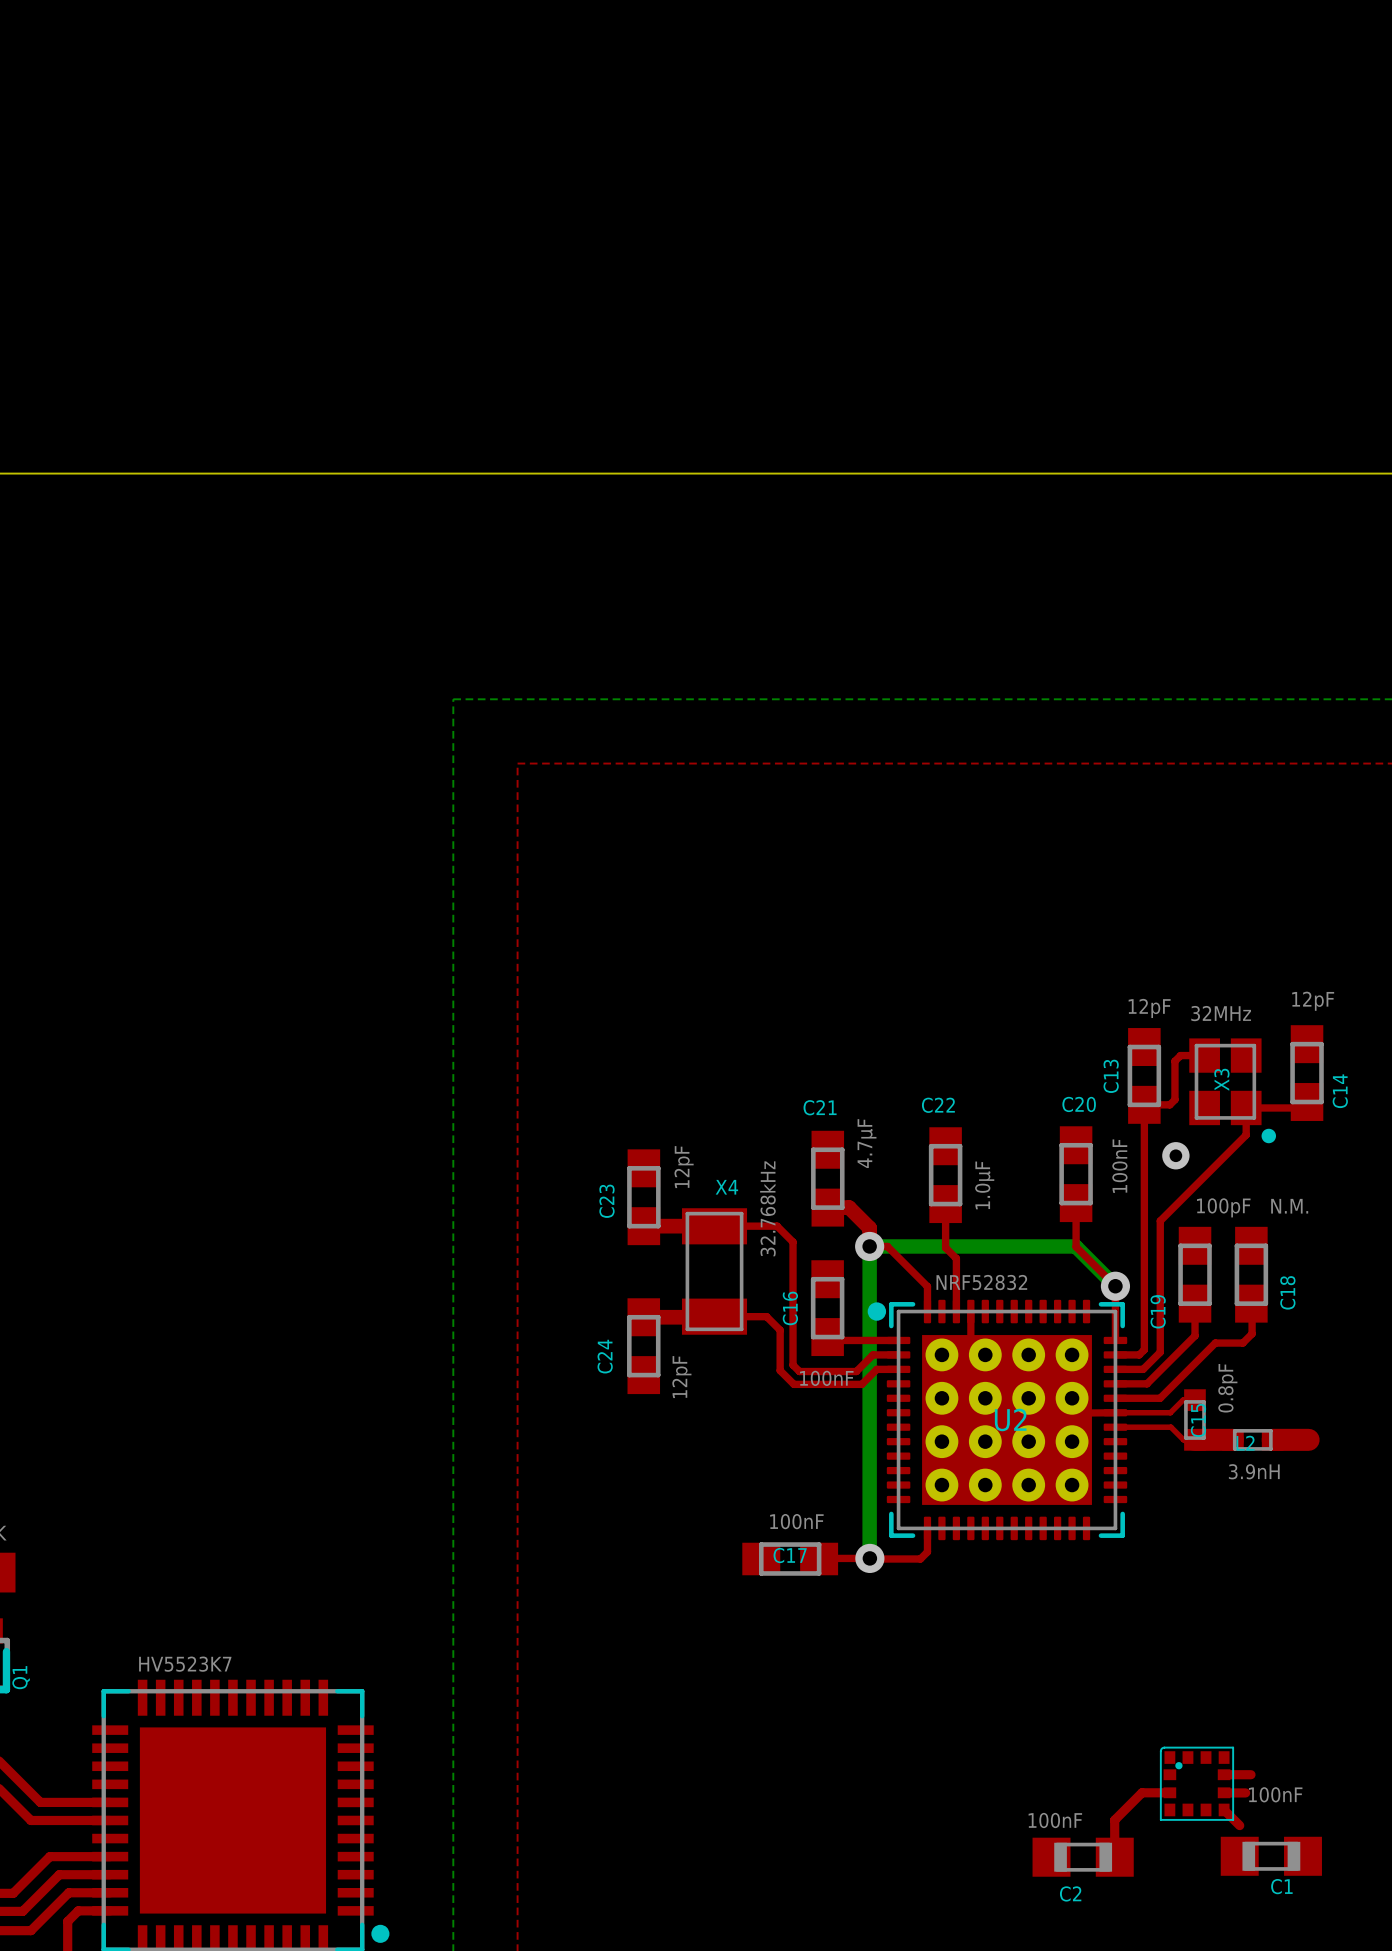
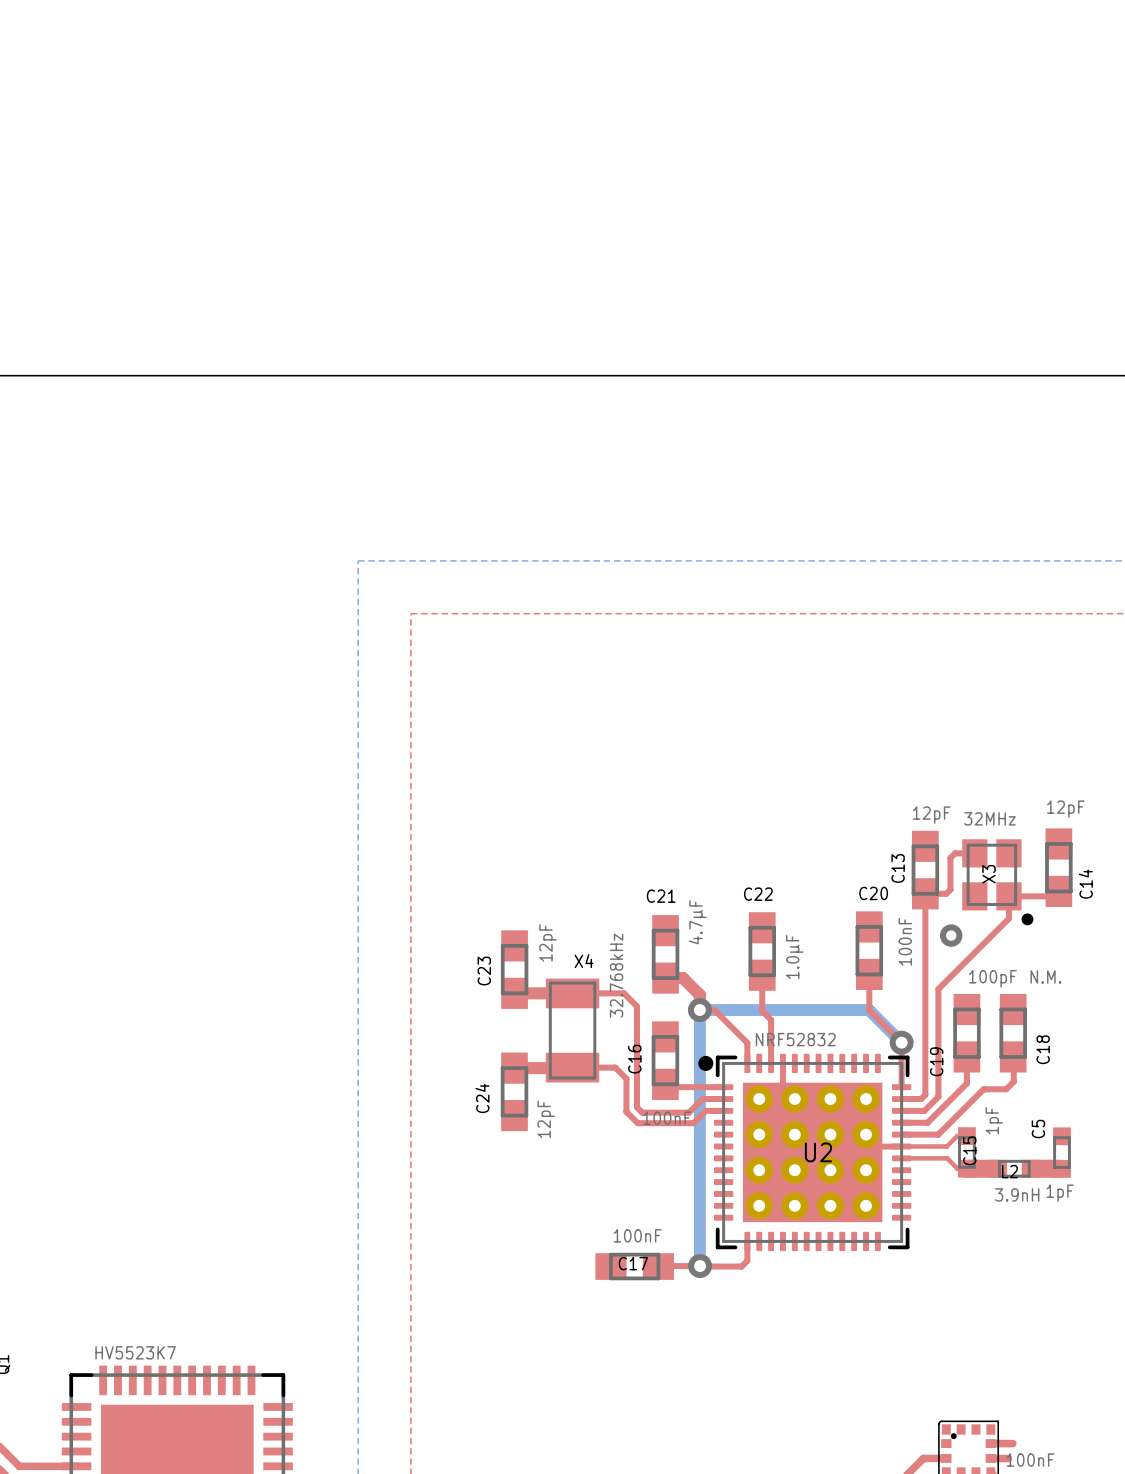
C15 value: 0.8pF (1227, 1388) -> 1pF (994, 1120)
C5: none -> 1pF (1062, 1152)

